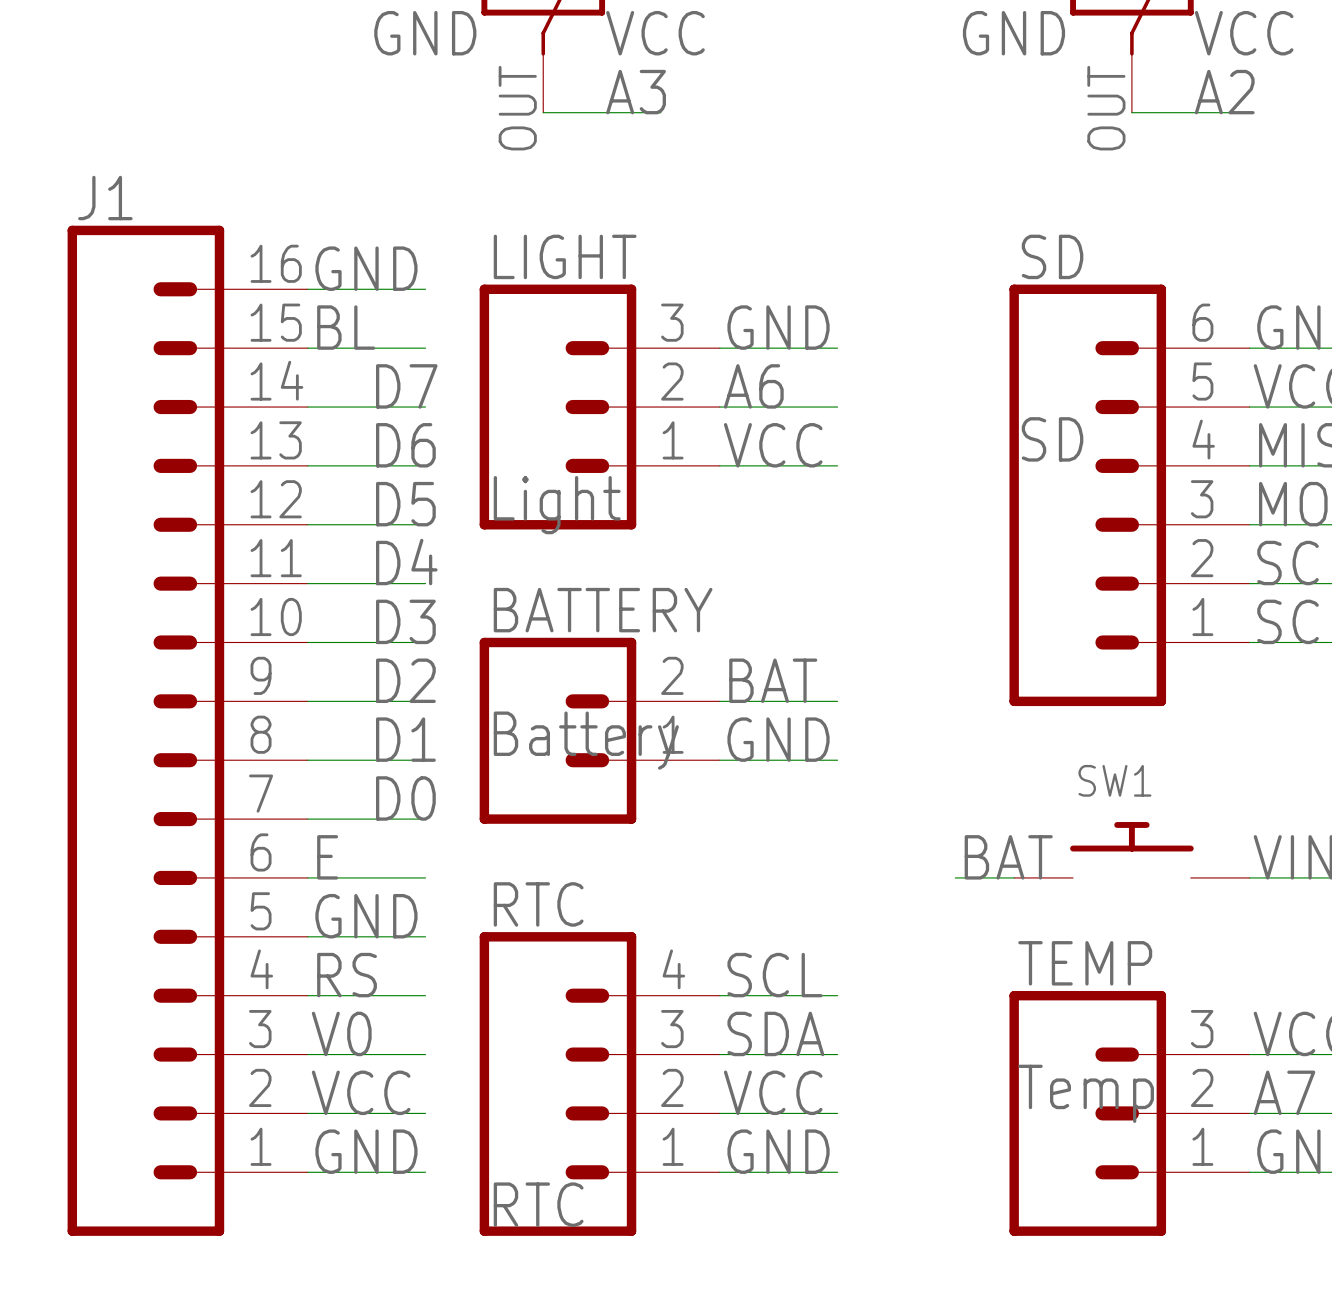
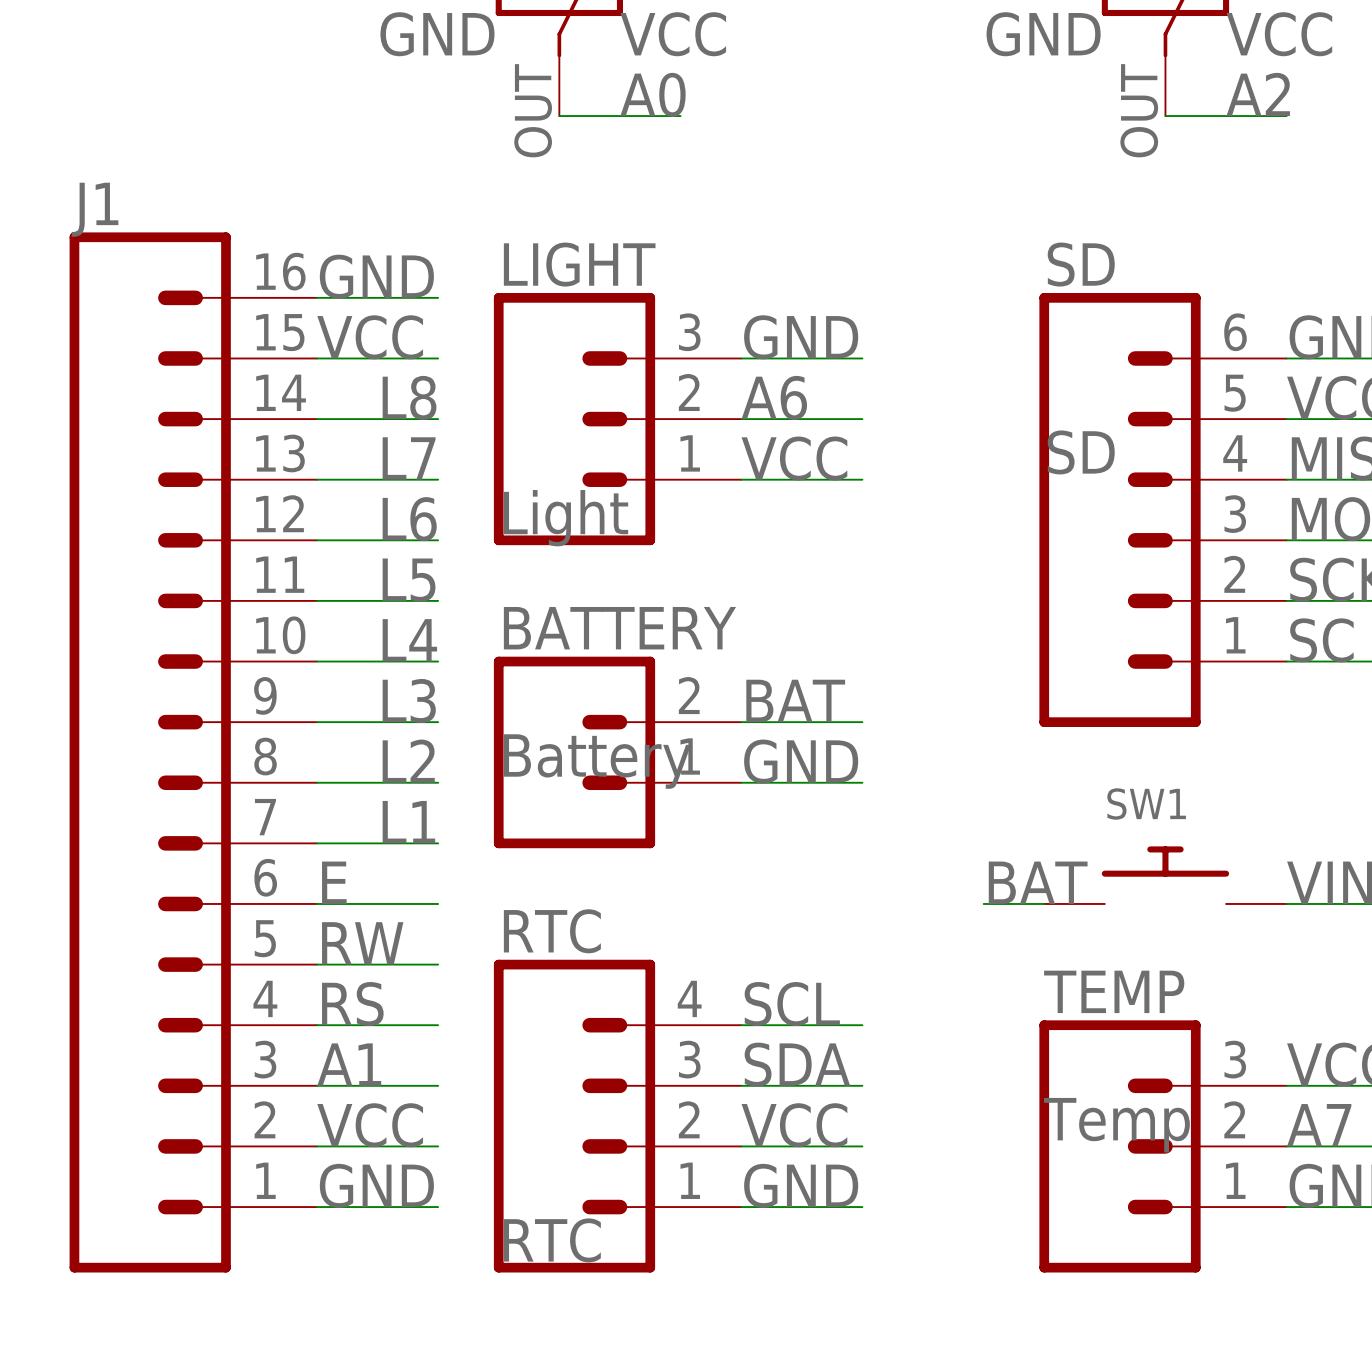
label: A3 (636, 92) -> A0 (653, 94)
label: BL (346, 327) -> VCC (370, 337)
label: D7 (406, 386) -> L8 (409, 397)
label: D6 (405, 445) -> L7 (409, 458)
label: D5 (405, 504) -> L6 (409, 519)
label: D4 (406, 562) -> L5 (409, 580)
label: D3 (405, 621) -> L4 (409, 640)
label: D2 (405, 680) -> L3 (409, 700)
label: D1 (405, 739) -> L2 (408, 761)
label: D0 (405, 798) -> L1 (408, 822)
label: GND (366, 916) -> RW (362, 943)
label: V0 (341, 1033) -> A1 (349, 1064)

